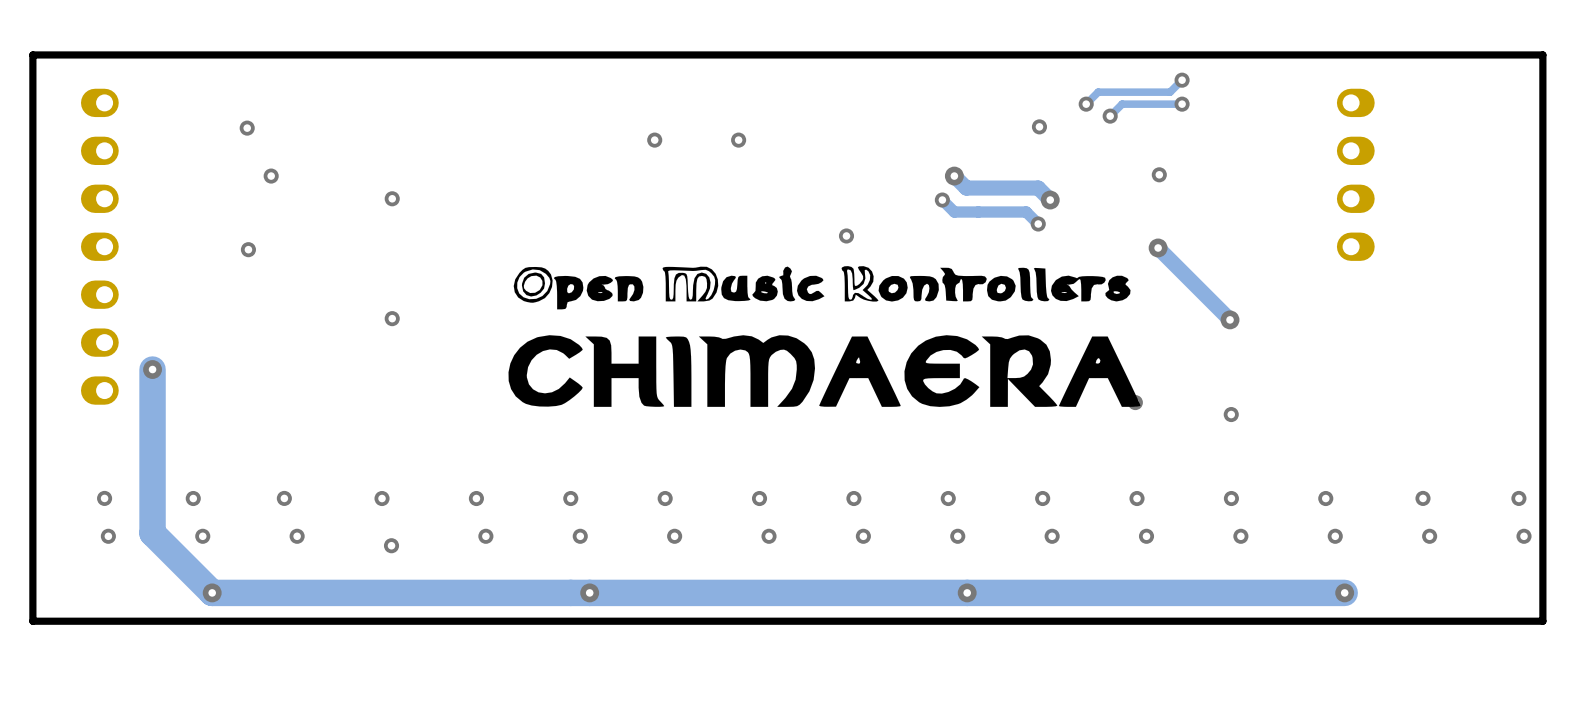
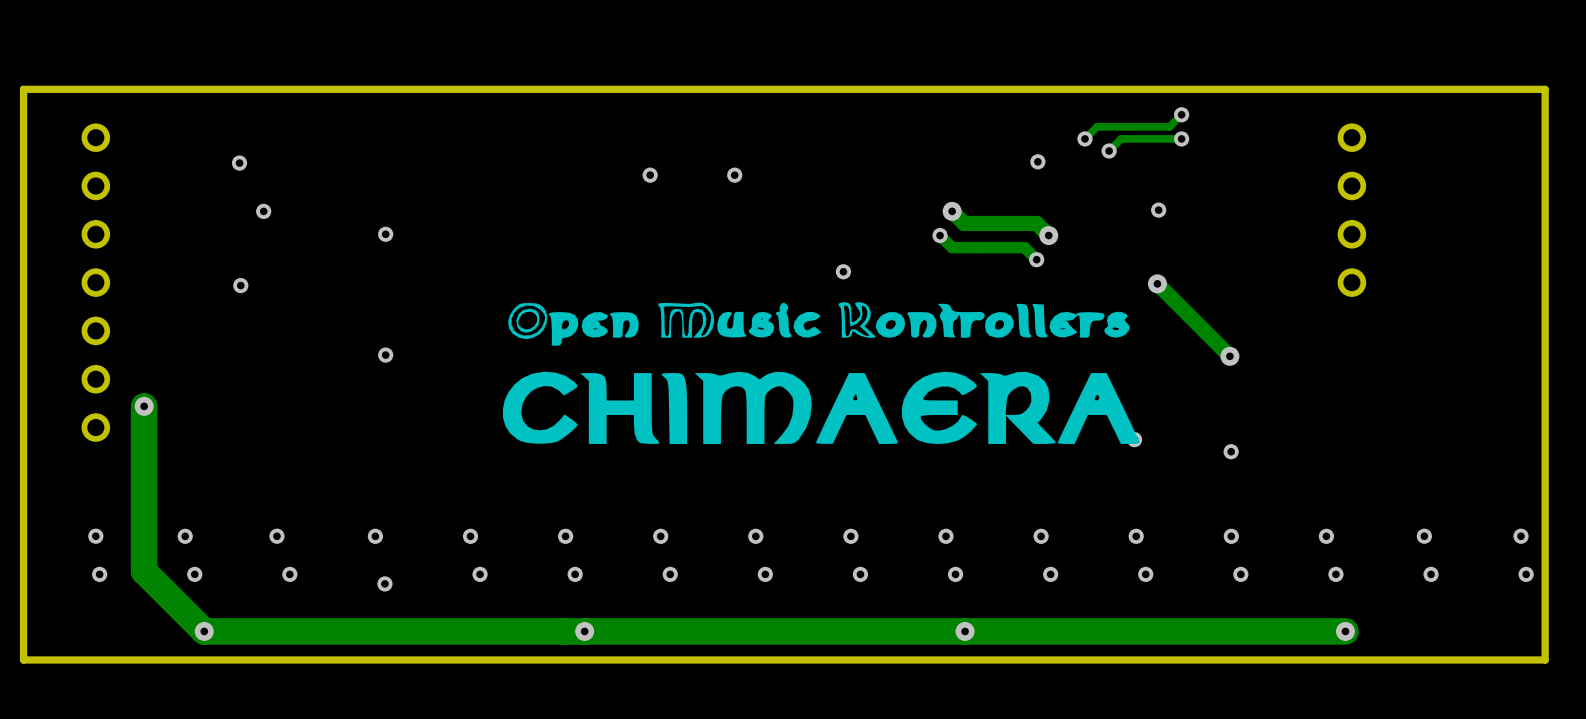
part footprint: [80, 88, 119, 261] -> [81, 123, 111, 297]
part footprint: [1336, 88, 1375, 261] -> [1337, 123, 1367, 297]
part footprint: [80, 280, 119, 405] -> [81, 316, 111, 442]

